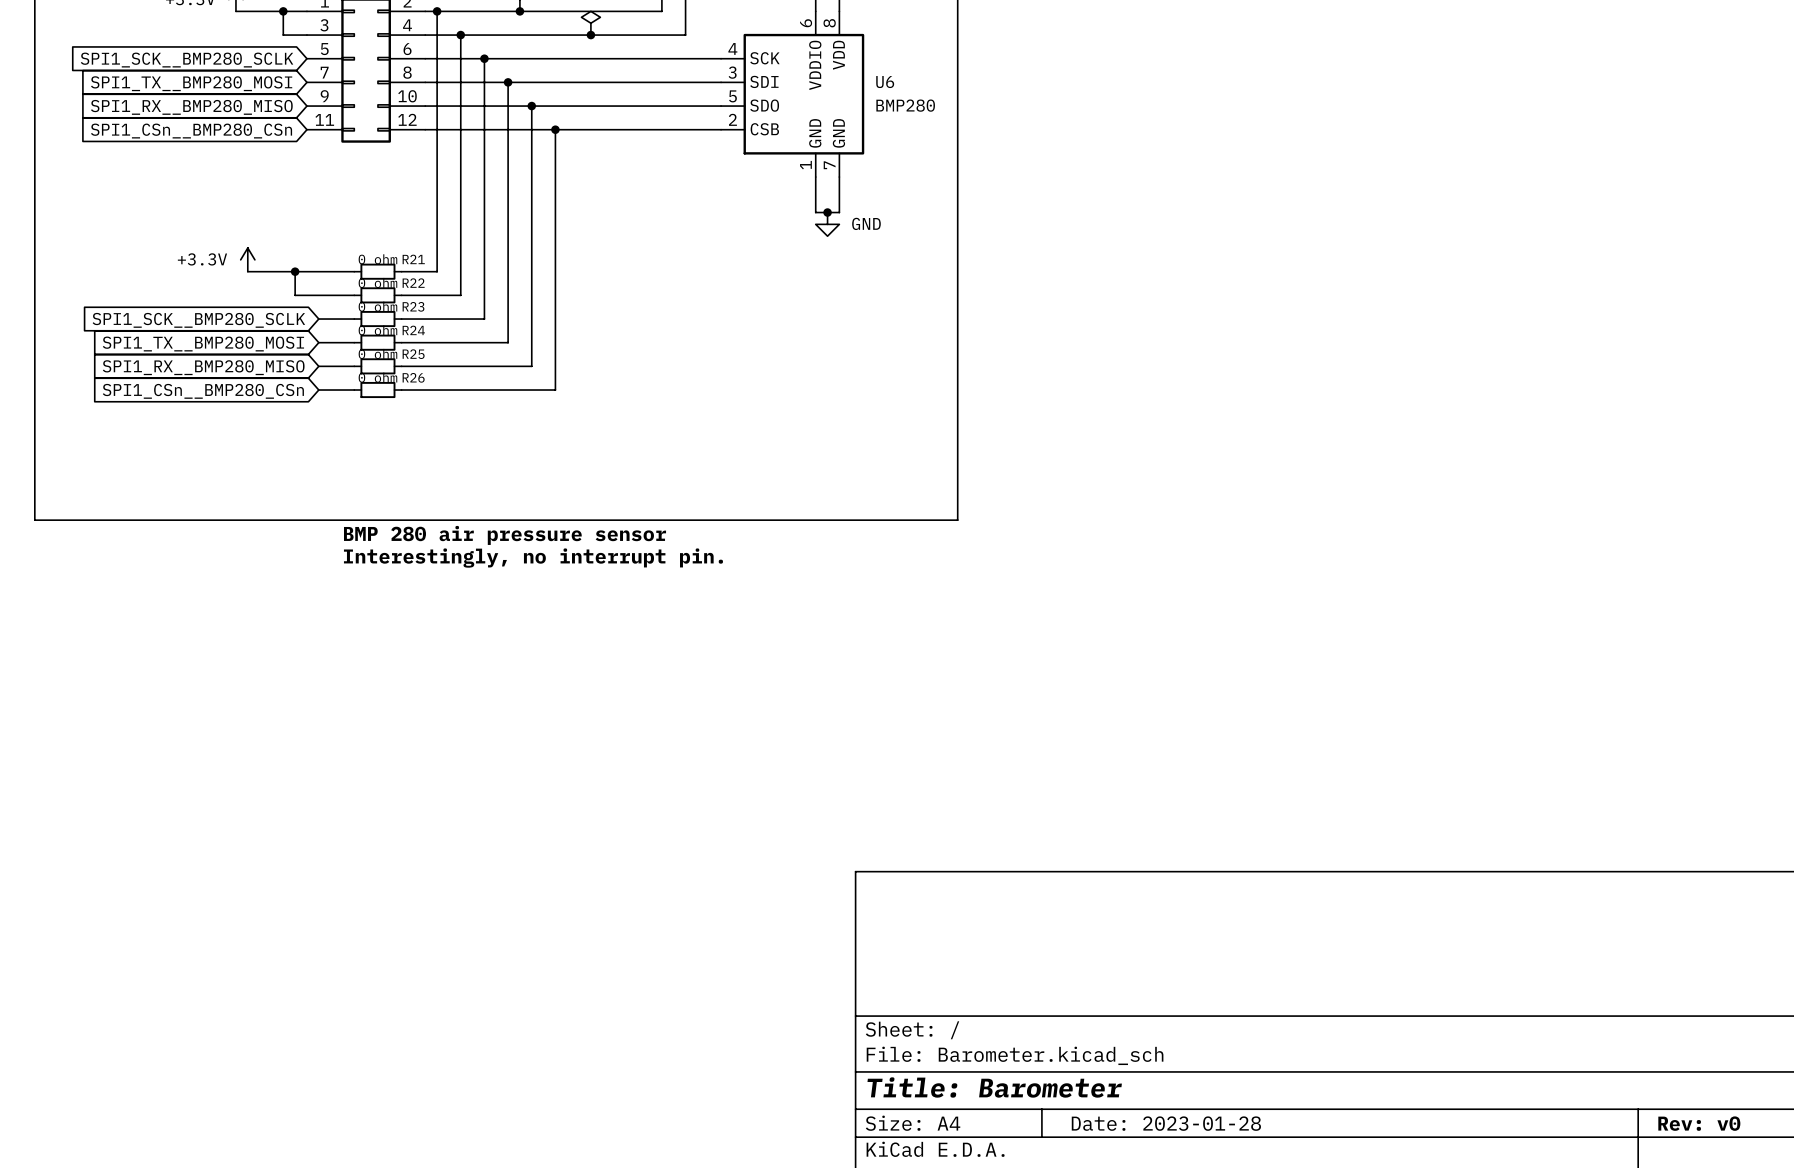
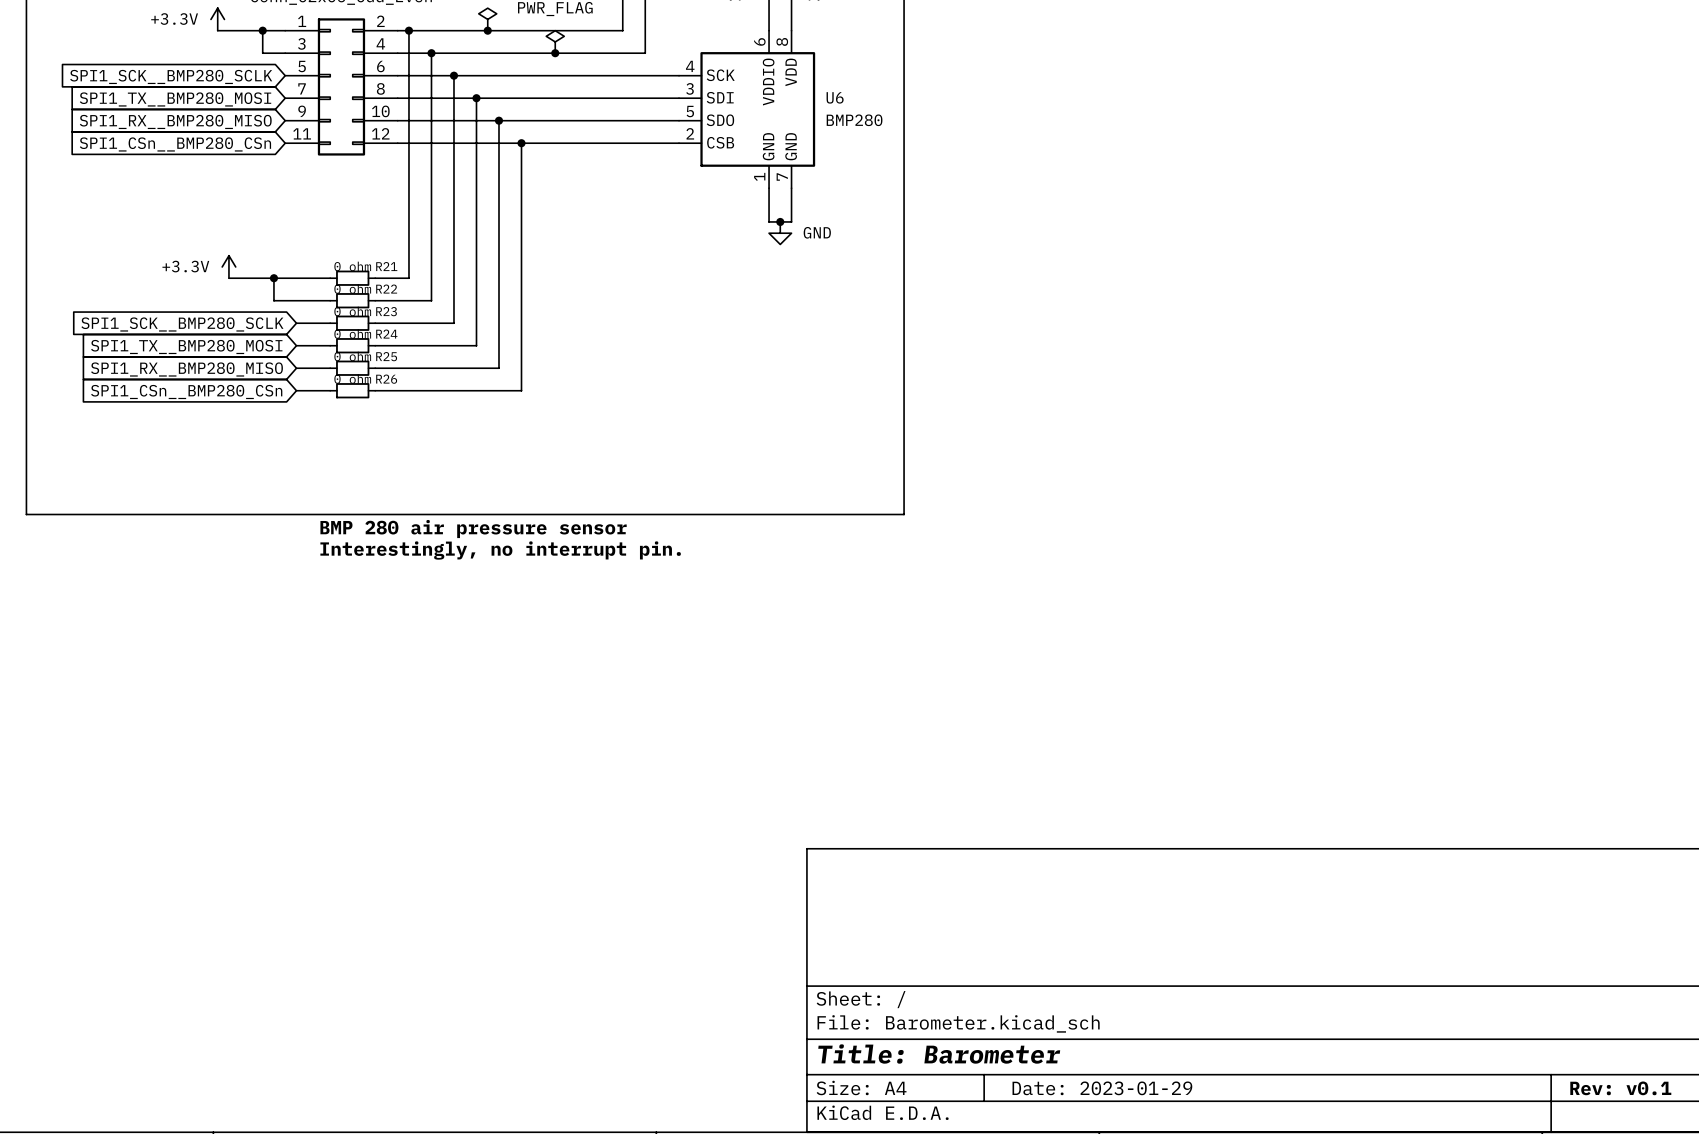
title block: Date: 2023-01-28 (1166, 1123) -> Date: 2023-01-29 (1102, 1088)
title block: Rev: v0 (1699, 1123) -> Rev: v0.1 (1620, 1088)

